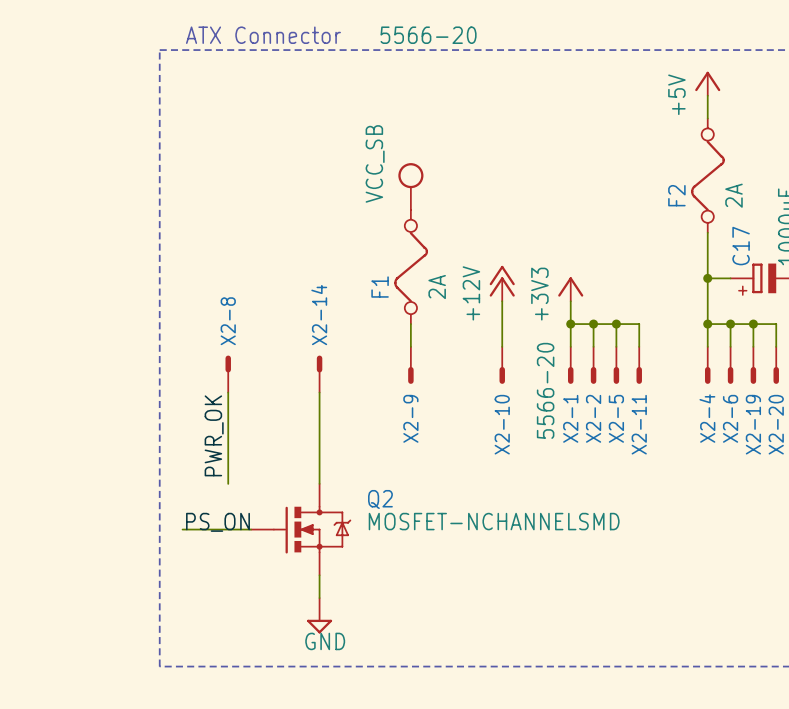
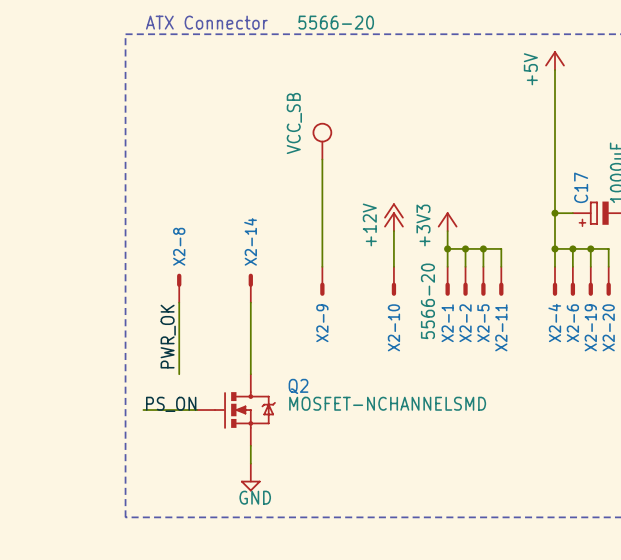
wire: none -> (555, 87) (555, 177)
F2: 2A (707, 175) -> none
wire: none -> (322, 159) (322, 248)
F1: 2A (411, 266) -> none

